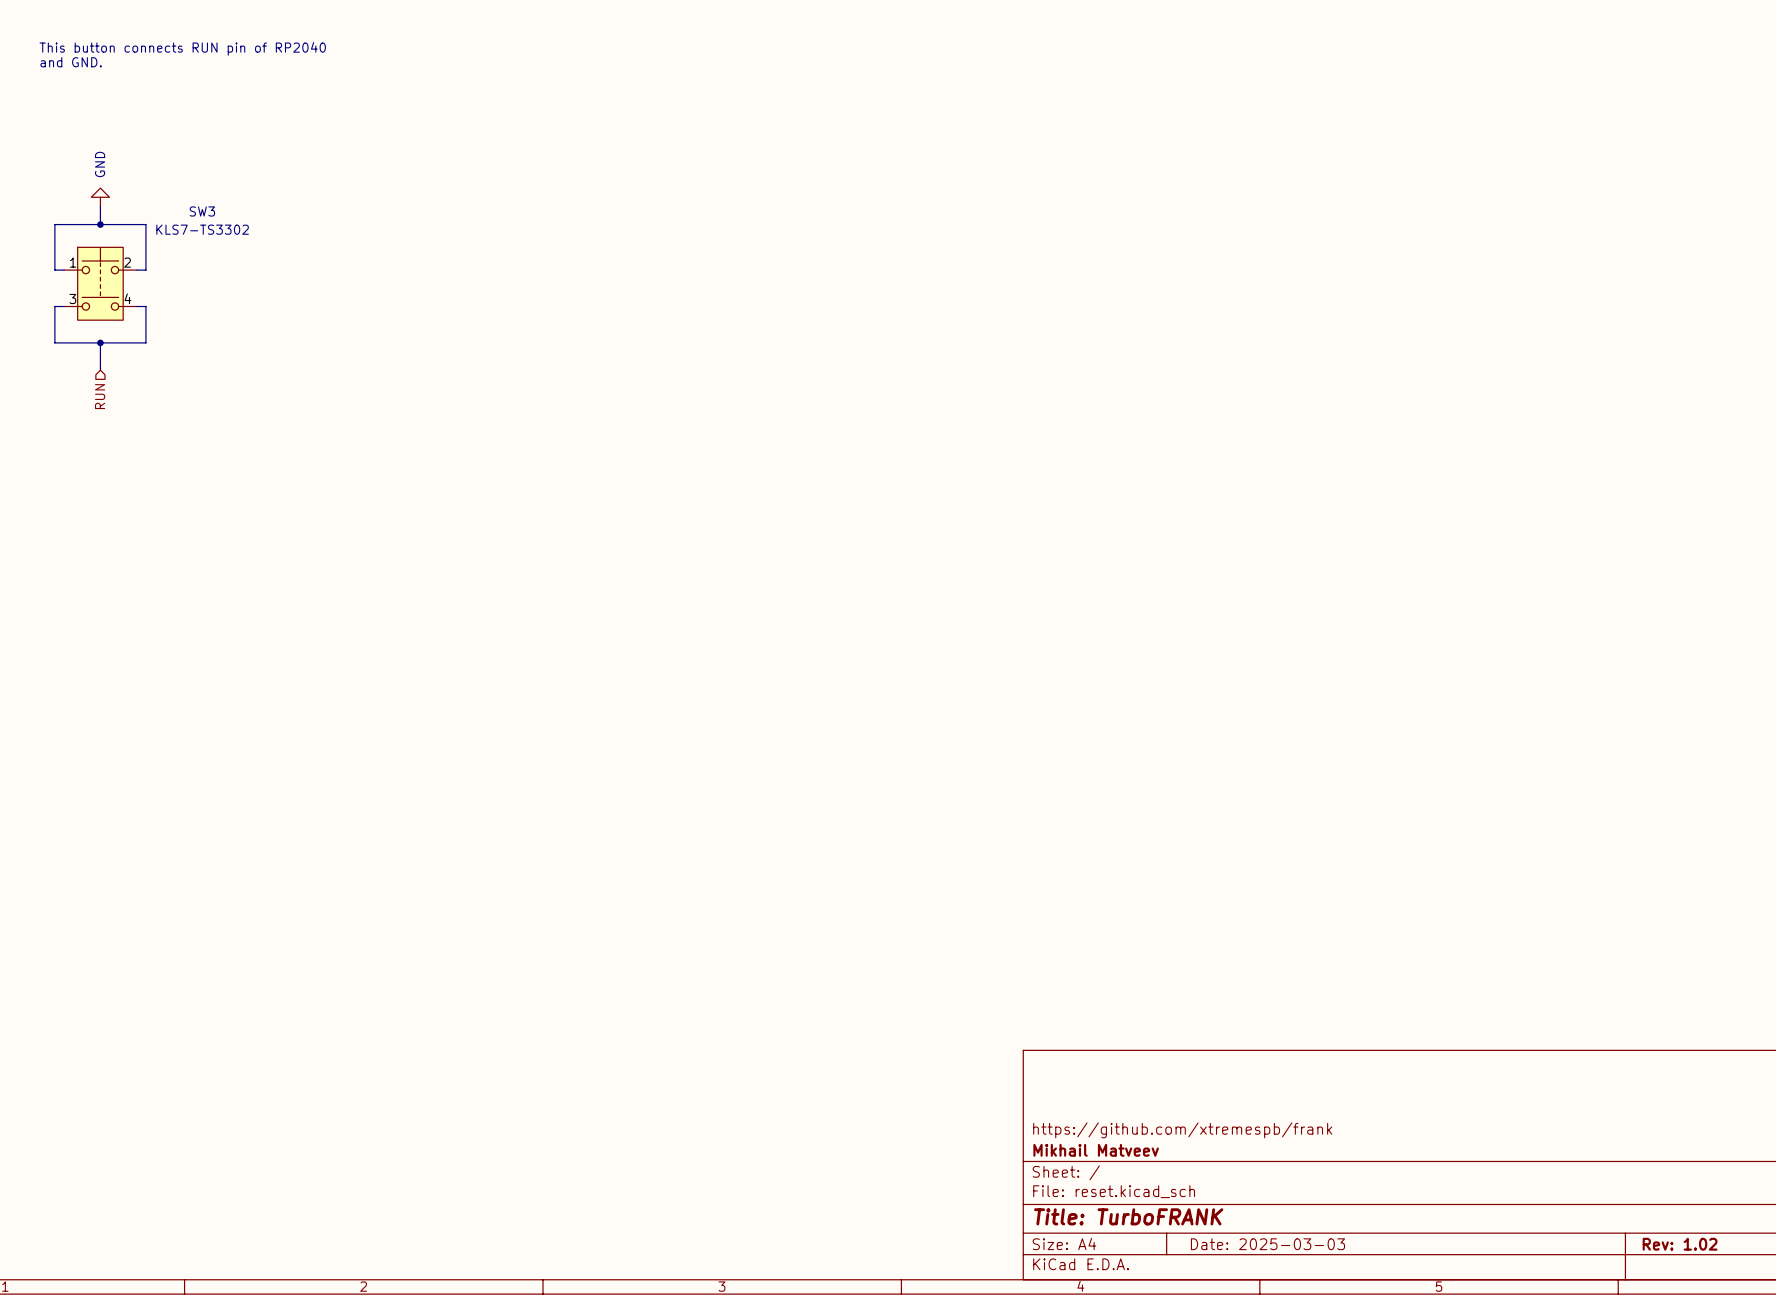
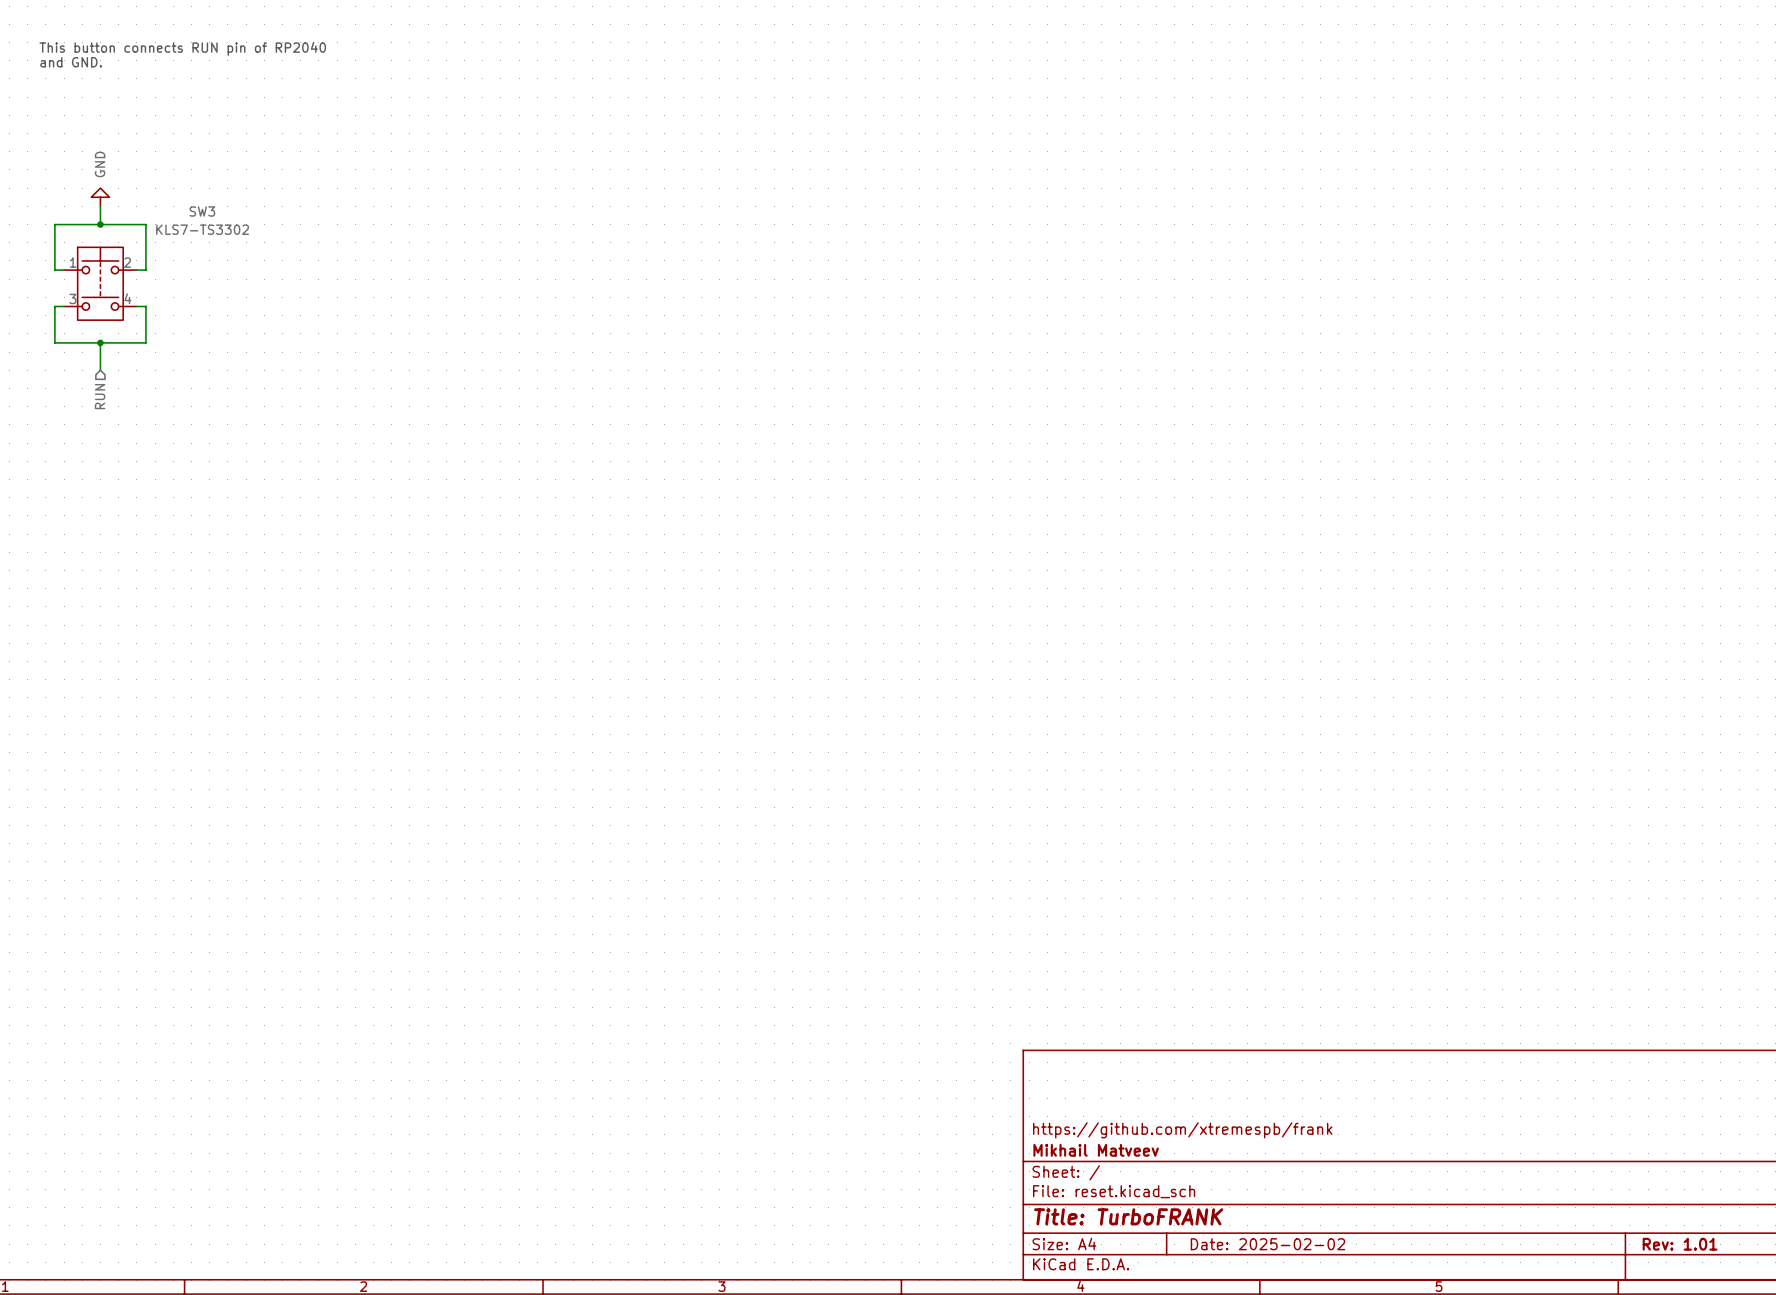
title block: Date: 2025-03-03 (1267, 1244) -> Date: 2025-02-02 (1267, 1244)
title block: Rev: 1.02 (1680, 1244) -> Rev: 1.01 (1680, 1244)

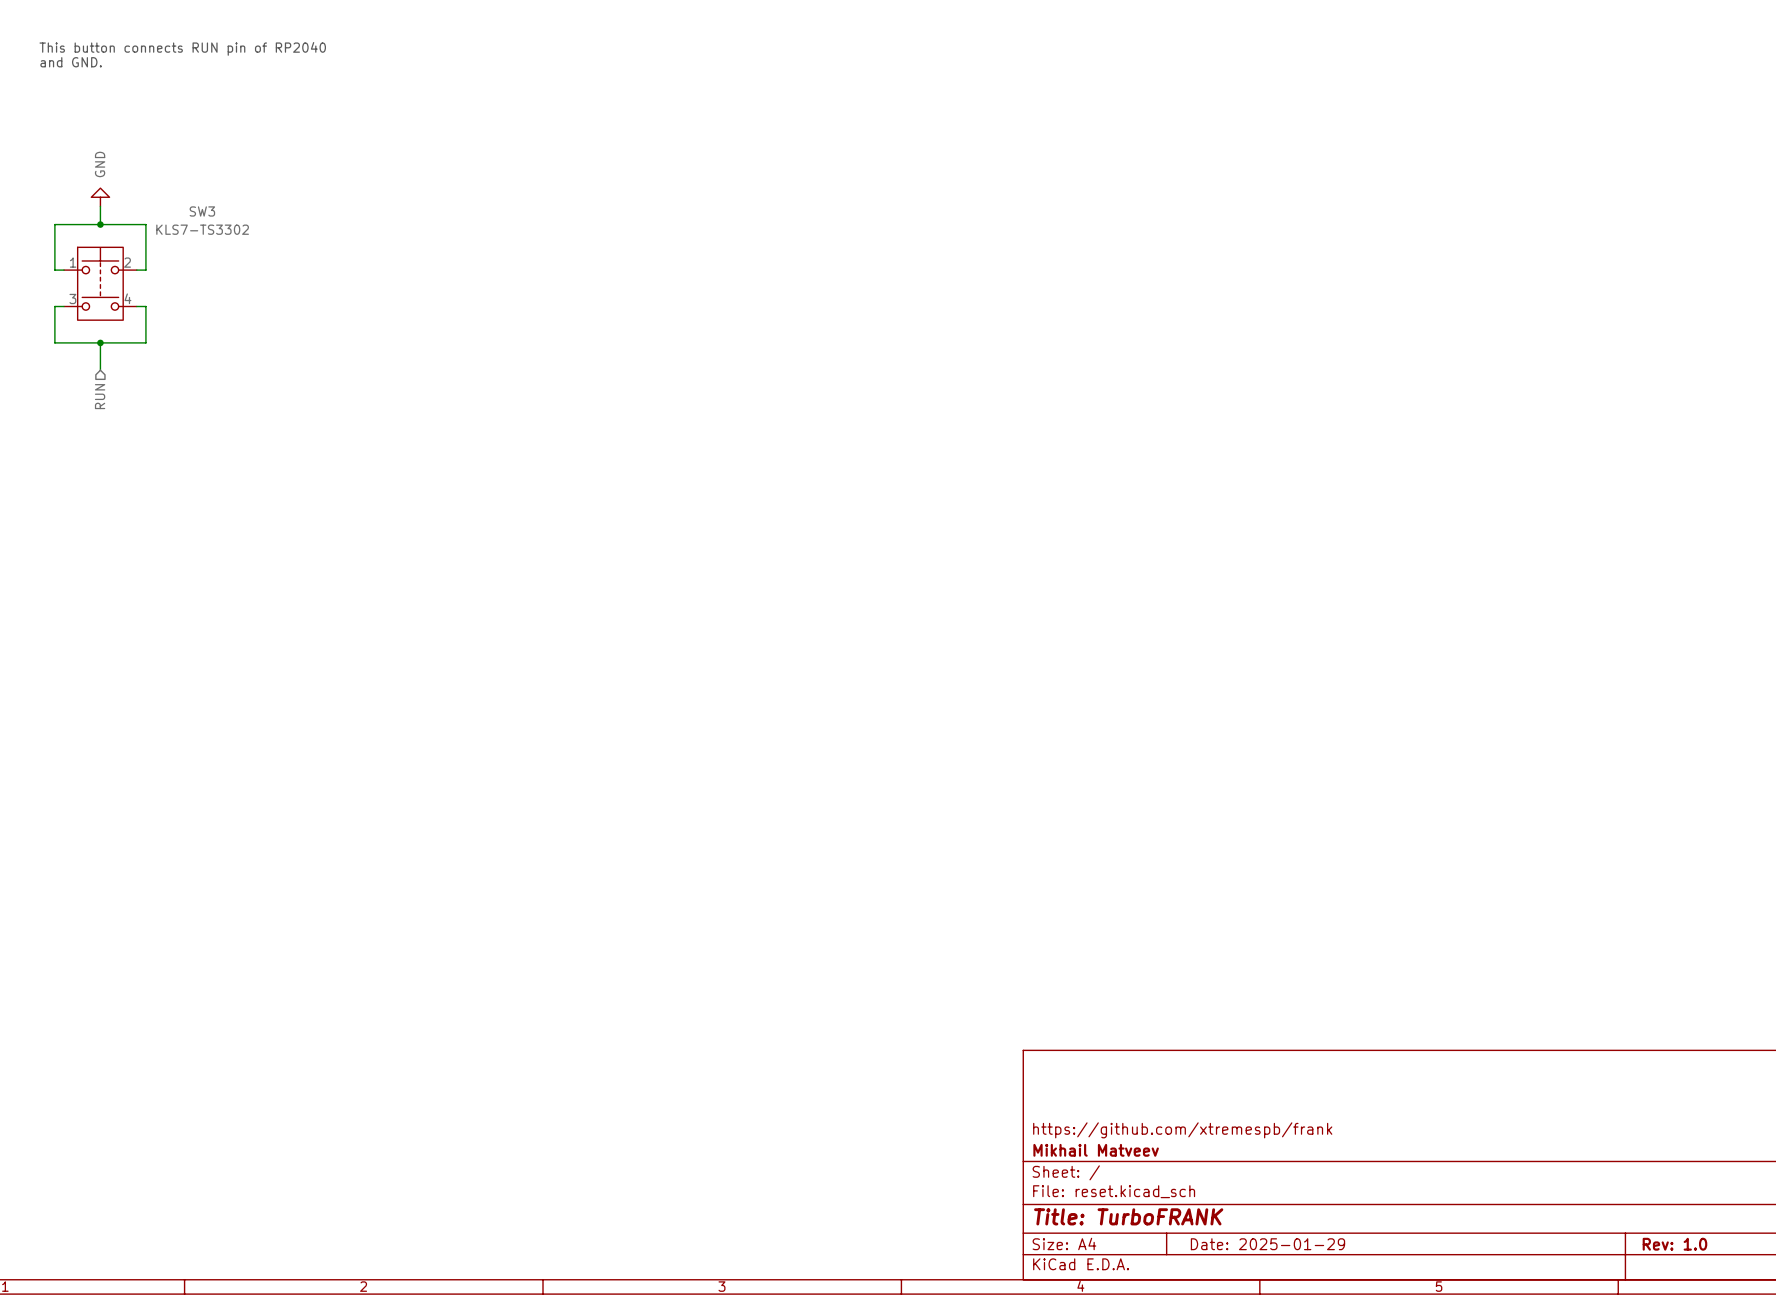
title block: Date: 2025-02-02 (1267, 1244) -> Date: 2025-01-29 (1267, 1244)
title block: Rev: 1.01 (1680, 1244) -> Rev: 1.0 (1674, 1244)

